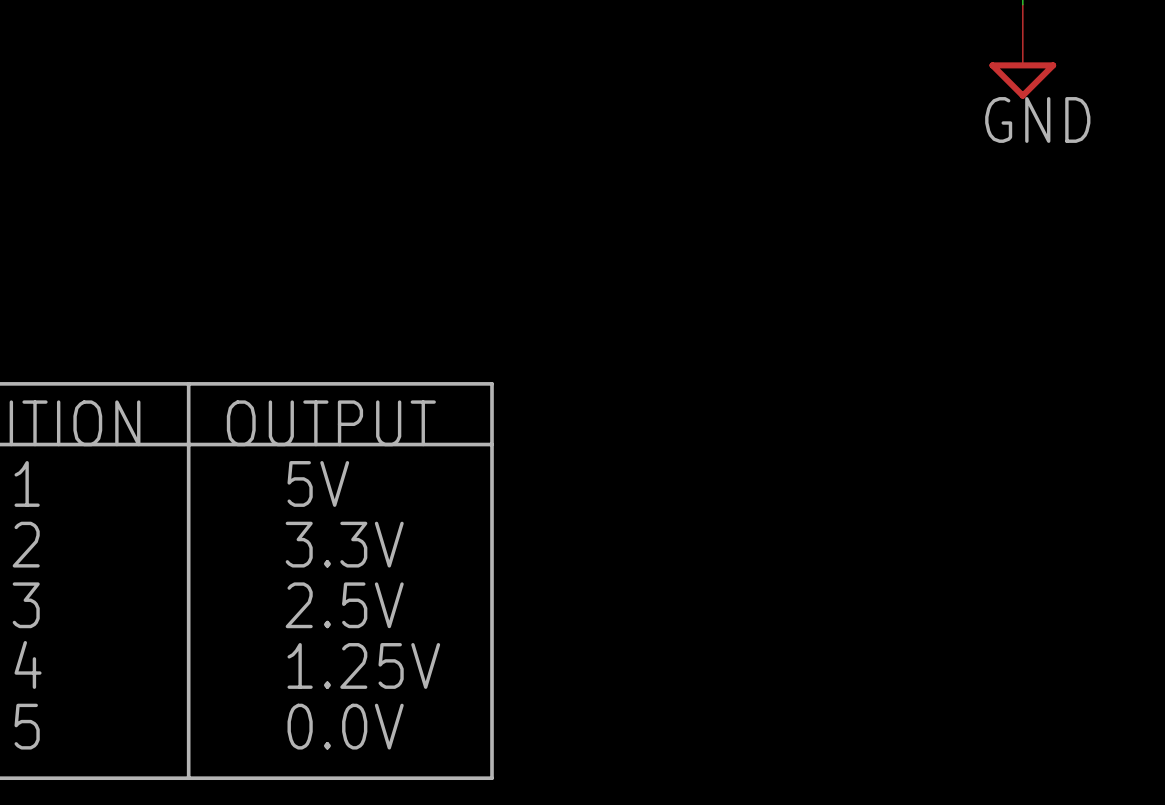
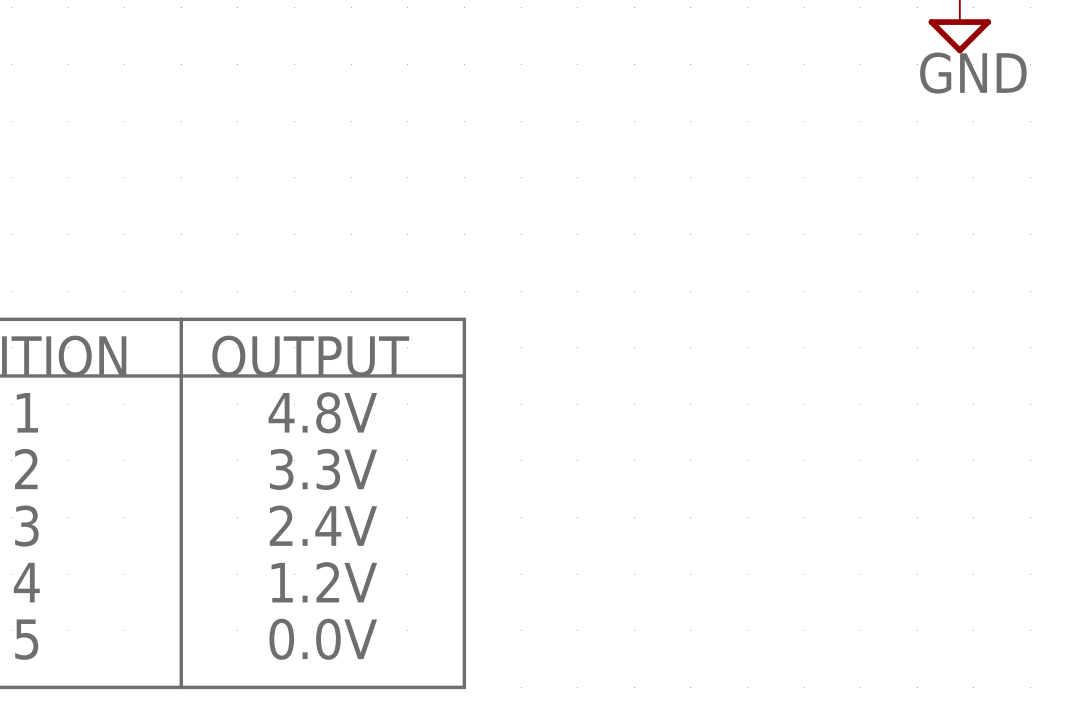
text: 5V (318, 483) -> 4.8V (322, 412)
text: 2.5V (344, 605) -> 2.4V (323, 525)
text: 1.25V (363, 665) -> 1.2V (324, 582)

